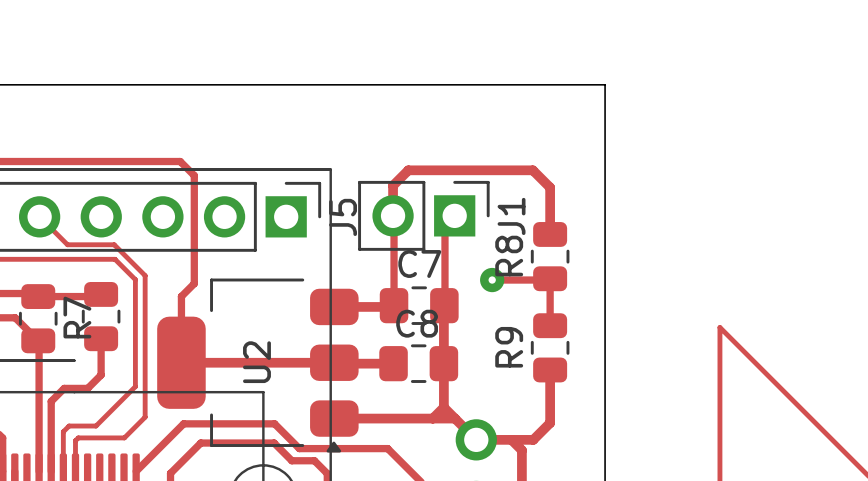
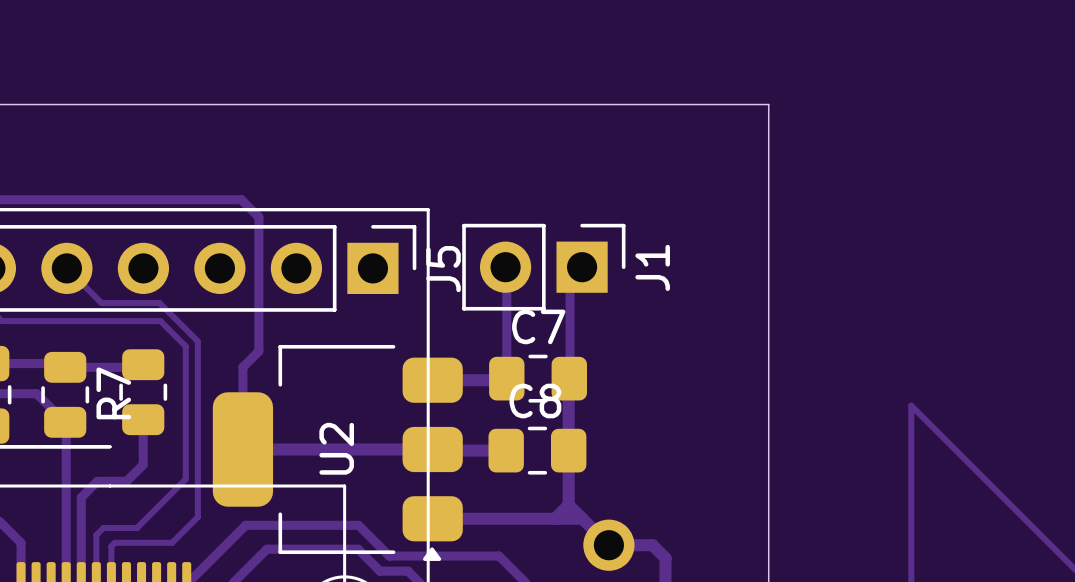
track: (393, 215) (393, 185) (408, 170) (532, 170) (550, 187) (550, 234) -> none
R8: (550, 256) -> none
track: (492, 280) (550, 278) (550, 325) -> none
via: (492, 280) -> none
R9: (550, 347) -> none
track: (550, 369) (550, 423) (533, 439) (511, 439) -> none

